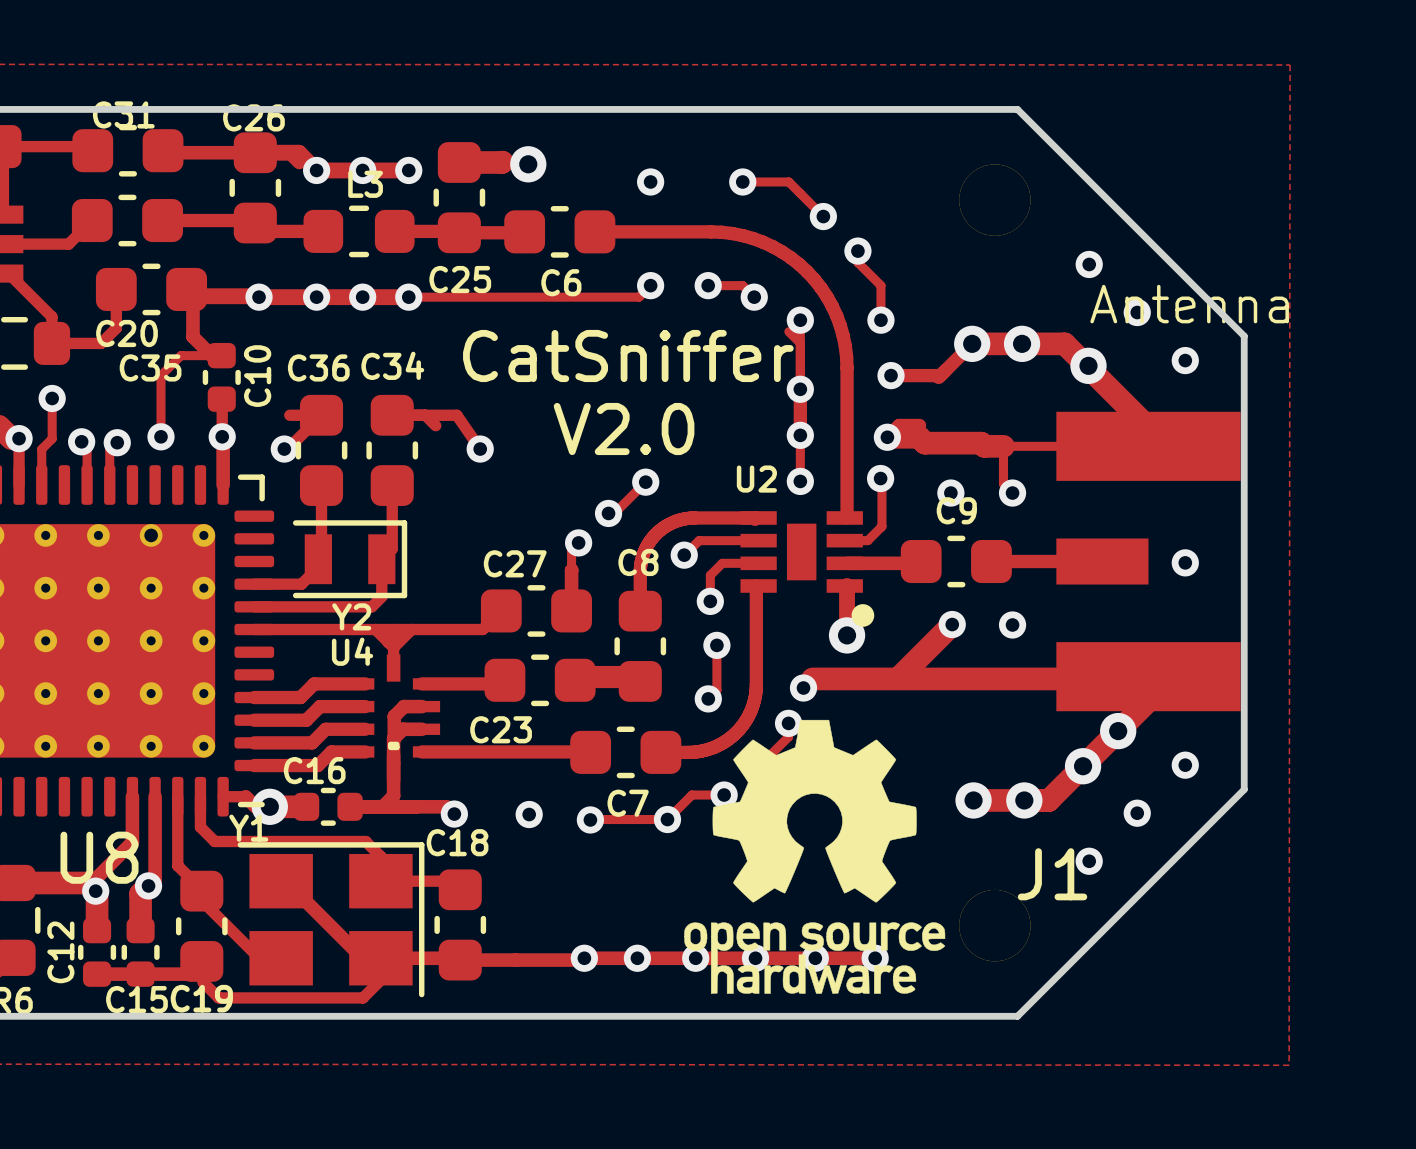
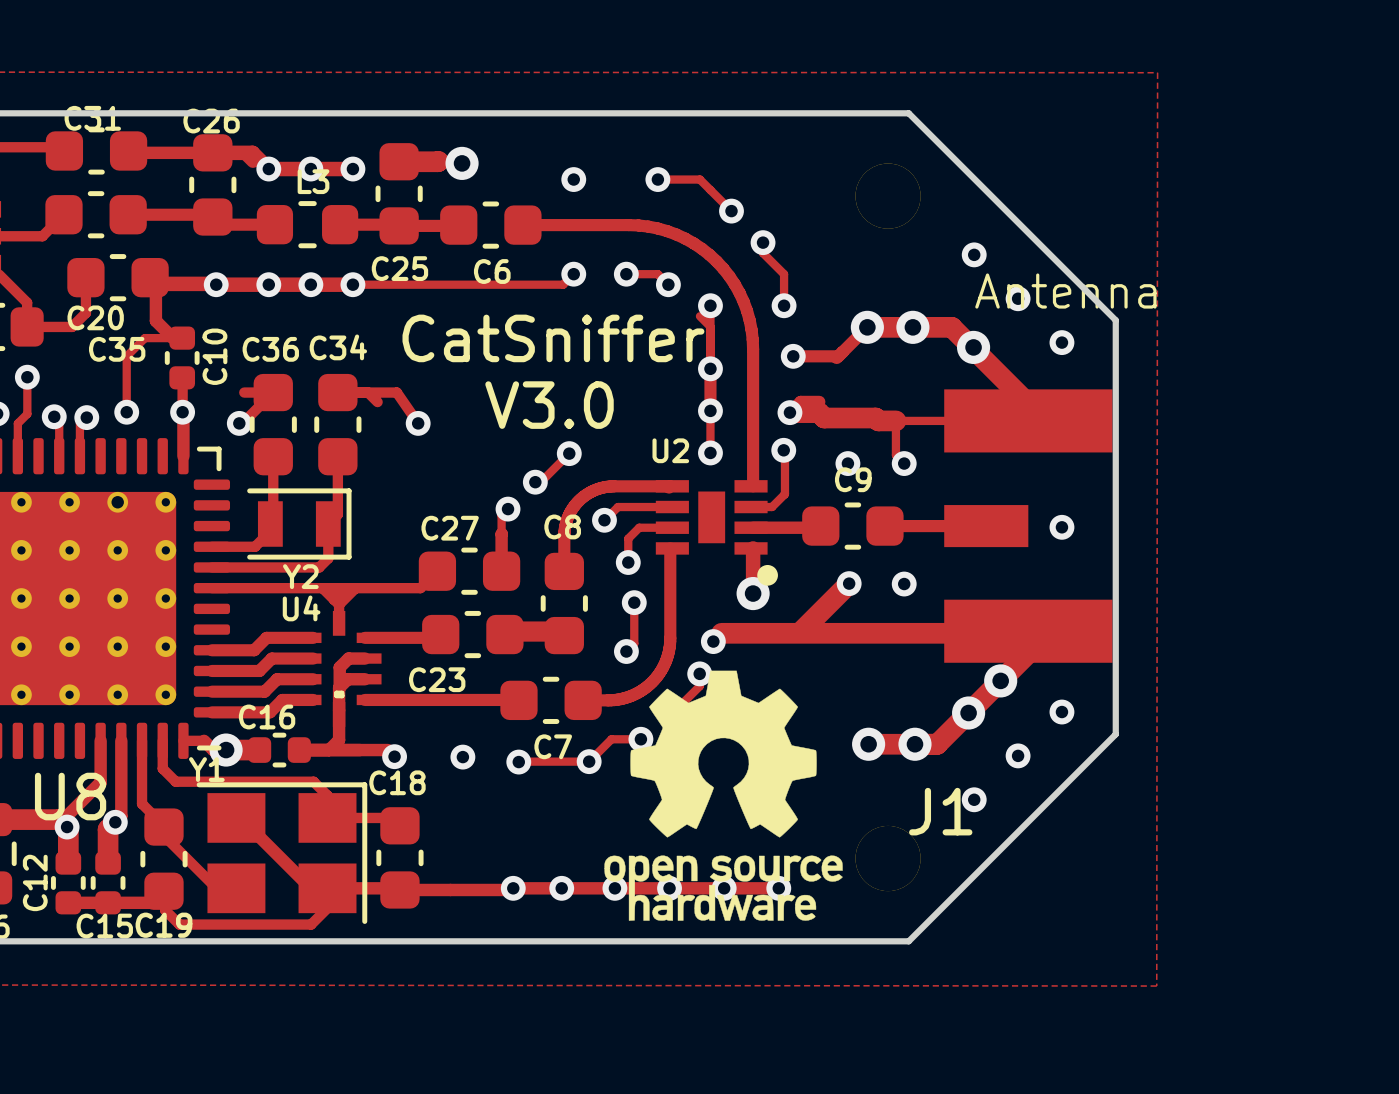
text: V2.0 (624, 429) -> V3.0 (549, 405)

